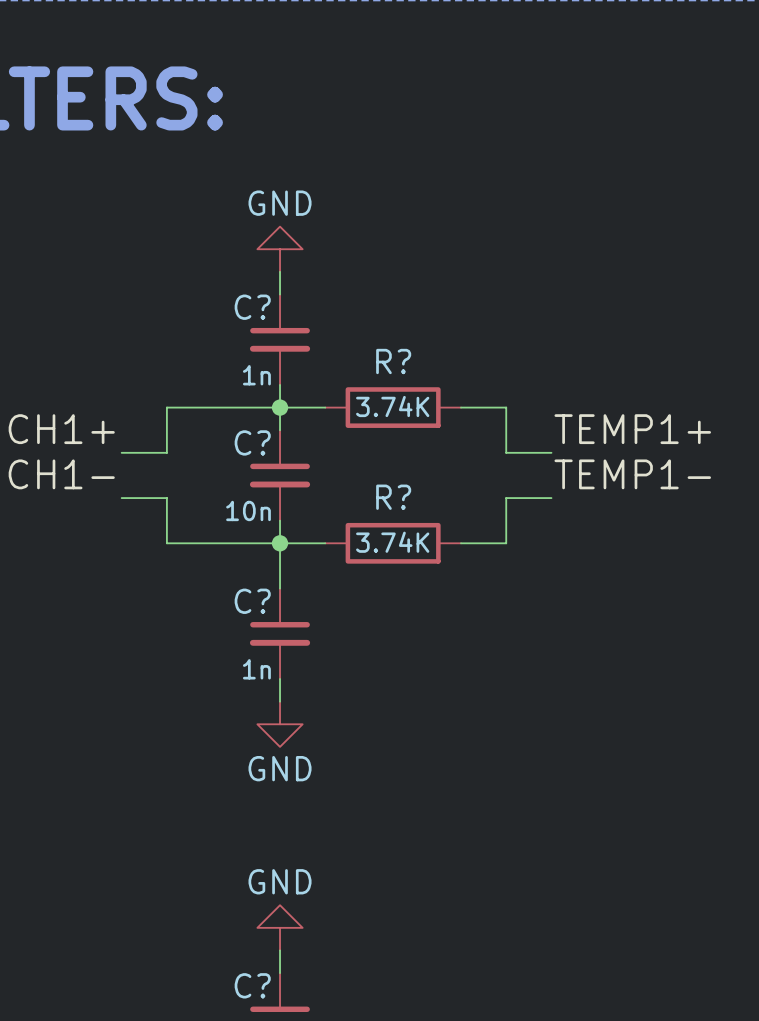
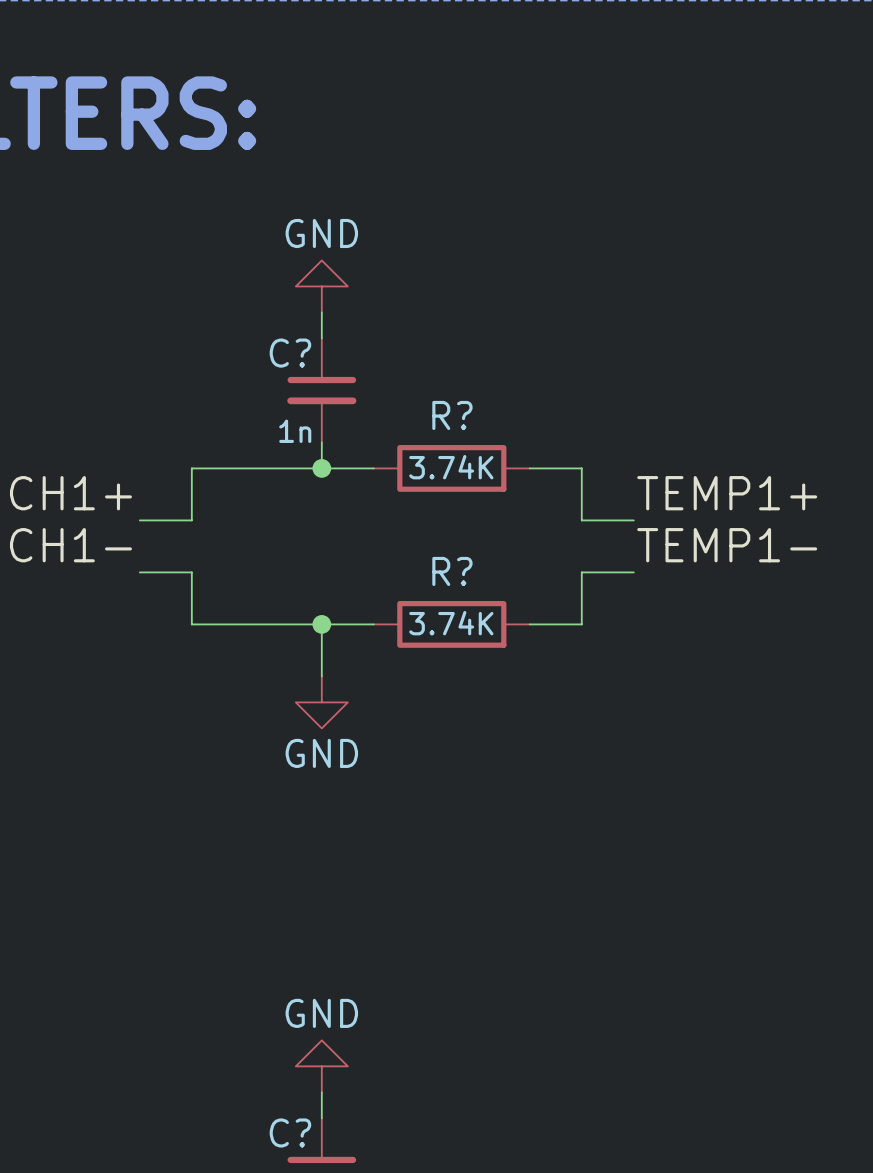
wire: (280, 407) (280, 430) -> none
C?: 10n (280, 475) -> none
wire: (280, 520) (280, 543) -> none
C?: 1n (280, 633) -> none
wire: (280, 679) (280, 701) -> none
power symbol position: GND (280, 724) -> GND (321, 702)

